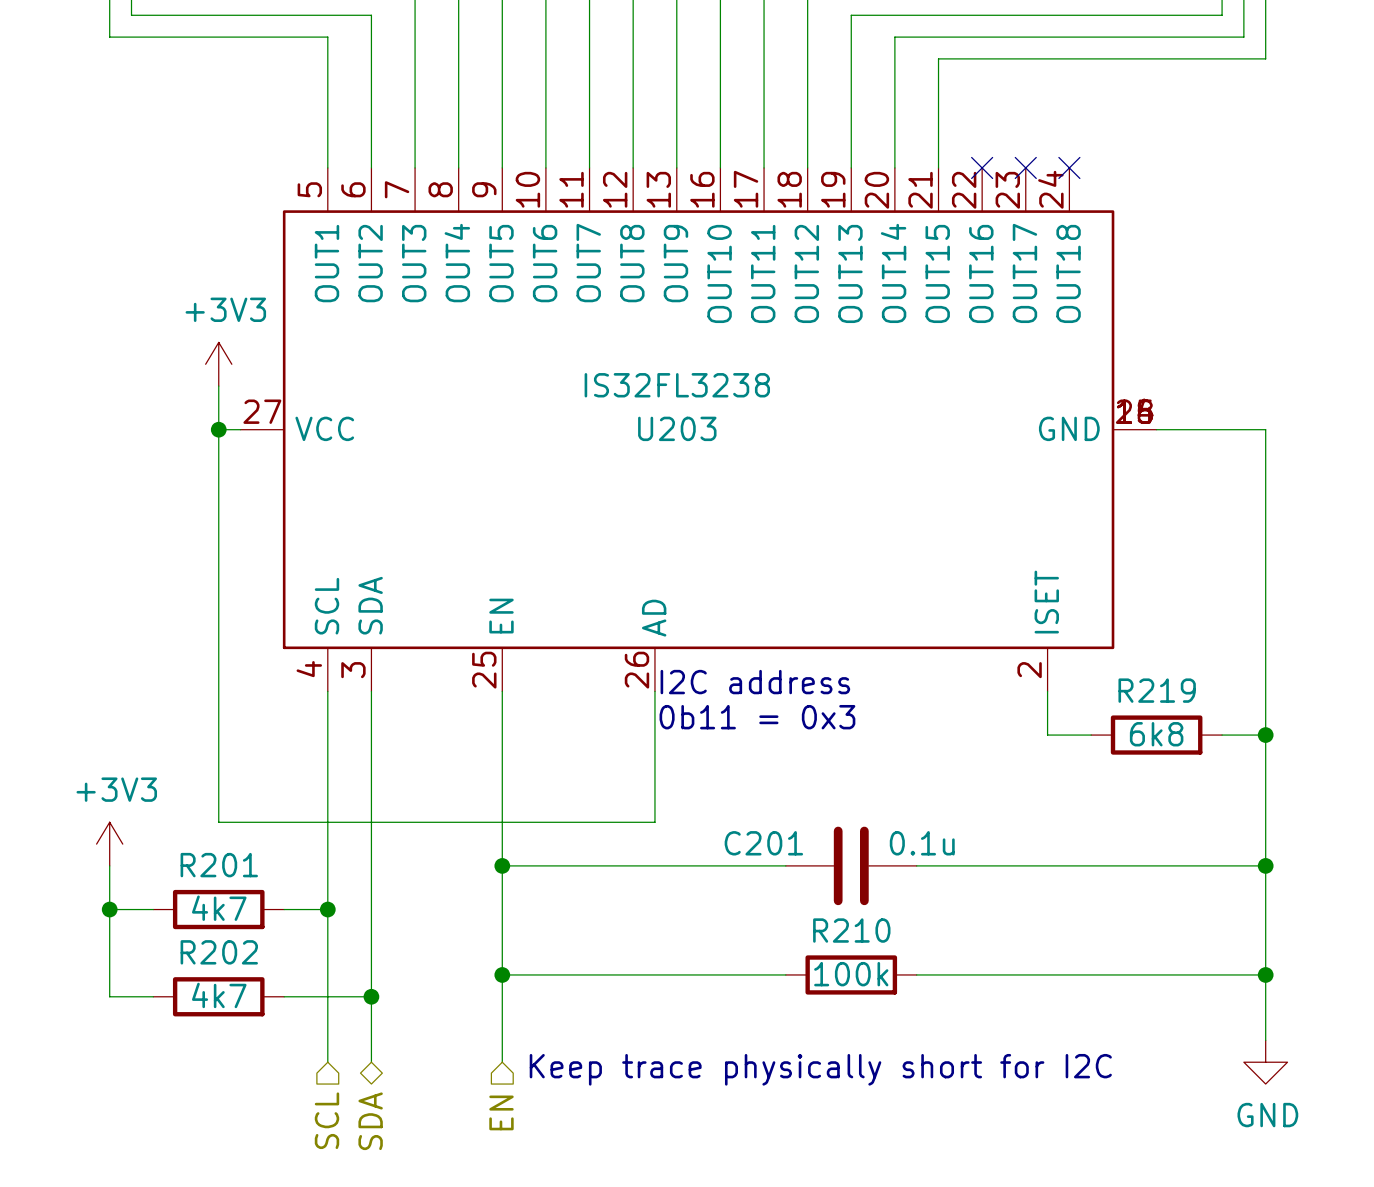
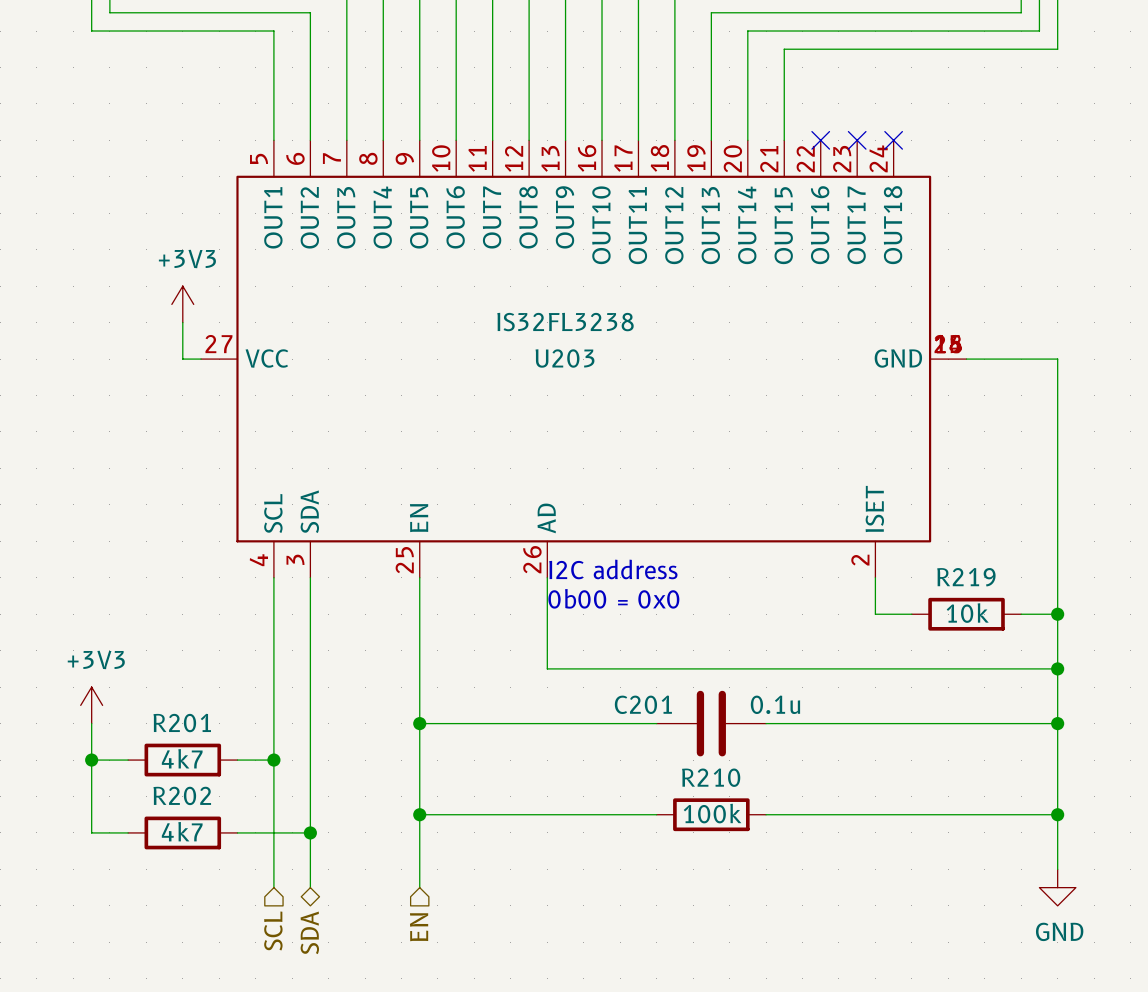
wire: (218, 429) (218, 822) (654, 822) (654, 800) -> (1057, 668) (547, 668)
junction: (218, 429) -> none
text: 0b11 = 0x3 (757, 717) -> 0b00 = 0x0 (613, 598)
R219 value: 6k8 (1156, 734) -> 10k (967, 613)
junction: none -> (1057, 668)
text: Keep trace physically short for I2C (820, 1069) -> none

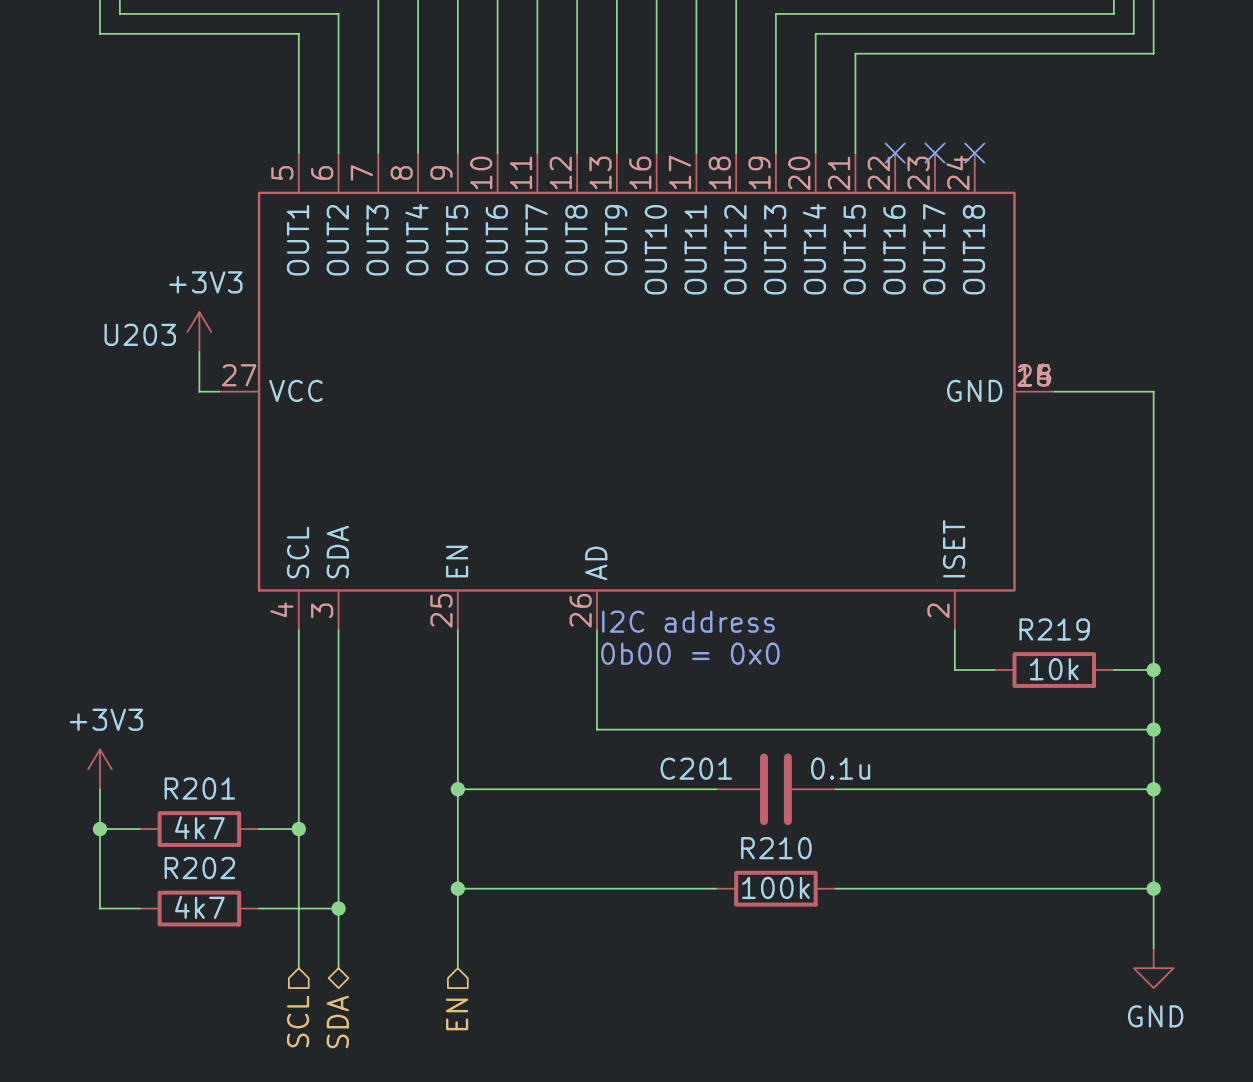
U203 value: IS32FL3238 (565, 322) -> none
U203 name position: U203 (565, 358) -> U203 (140, 334)

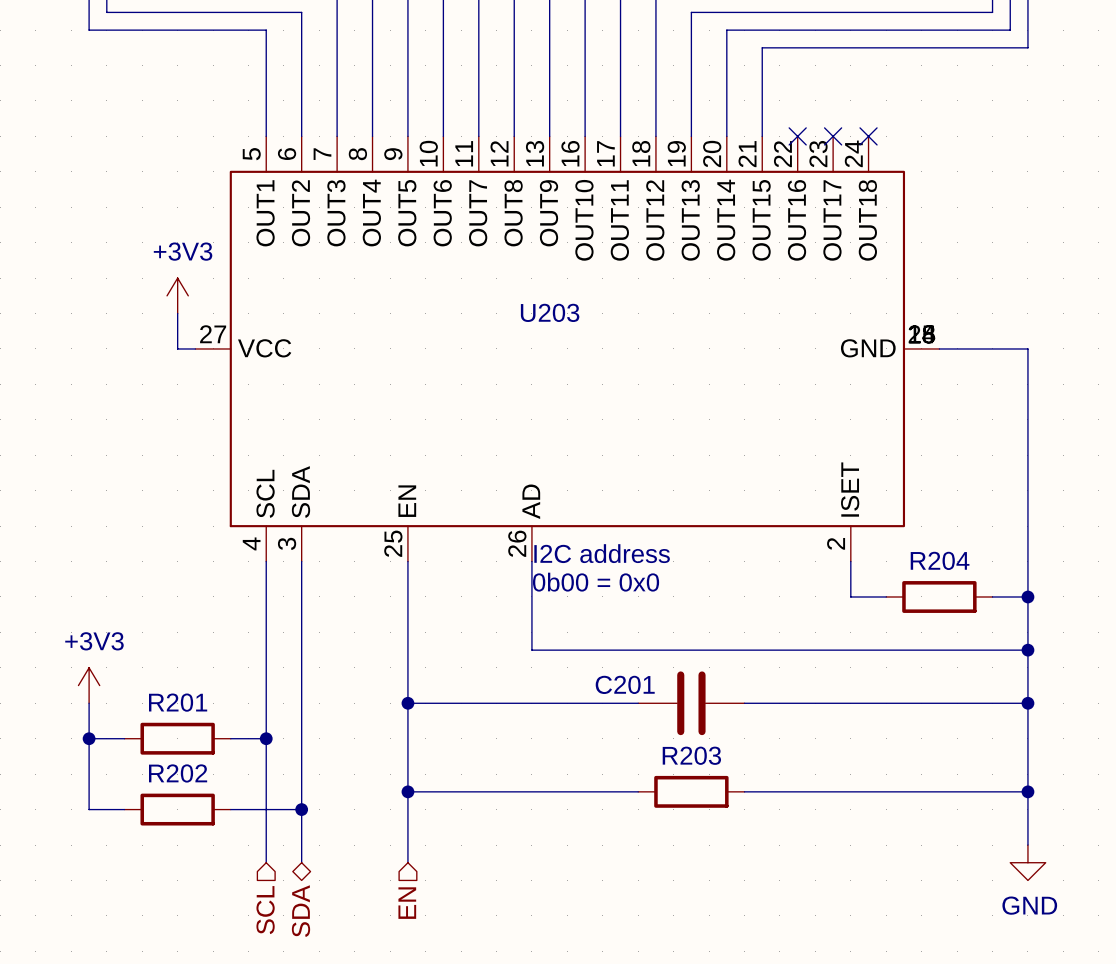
U203 name position: U203 (140, 334) -> U203 (550, 312)
R219 name: R219 (1054, 629) -> R204 (940, 560)
R219 value: 10k (1054, 669) -> none
C201 value: 0.1u (840, 768) -> none
R201 value: 4k7 (199, 827) -> none
R210 name: R210 (776, 848) -> R203 (691, 755)
R210 value: 100k (775, 887) -> none
R202 value: 4k7 (199, 907) -> none

